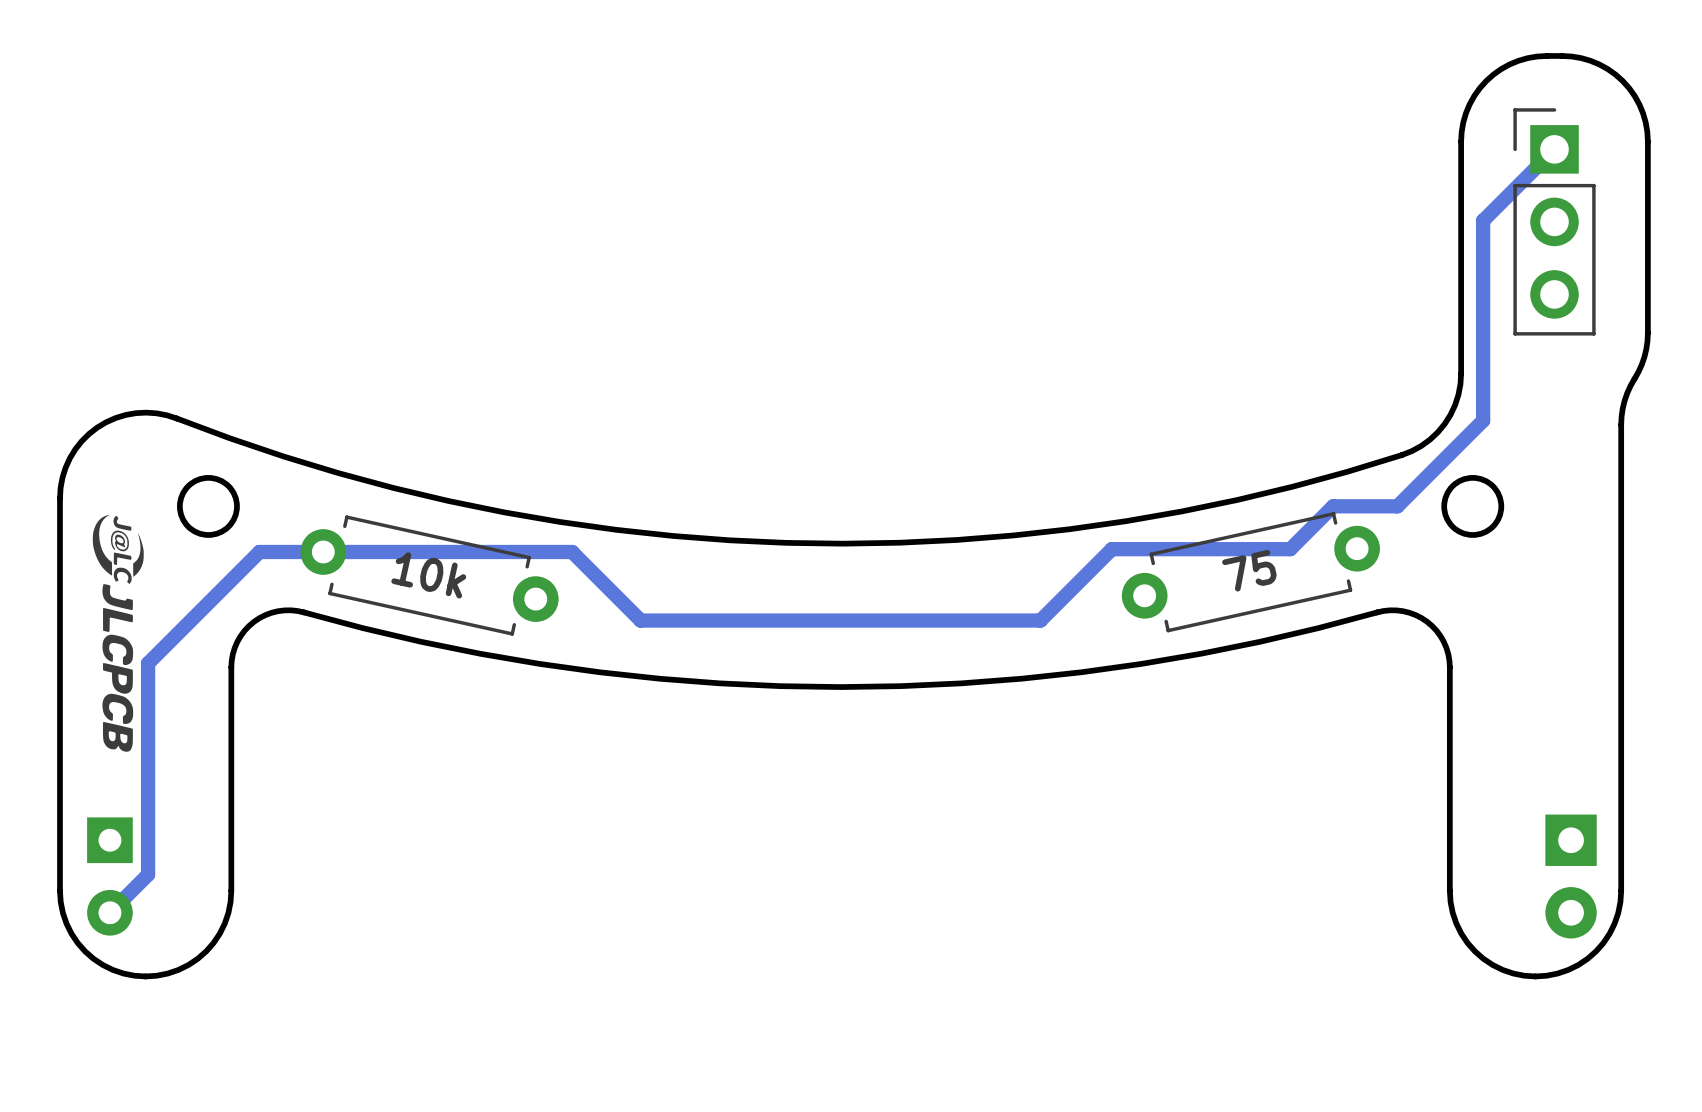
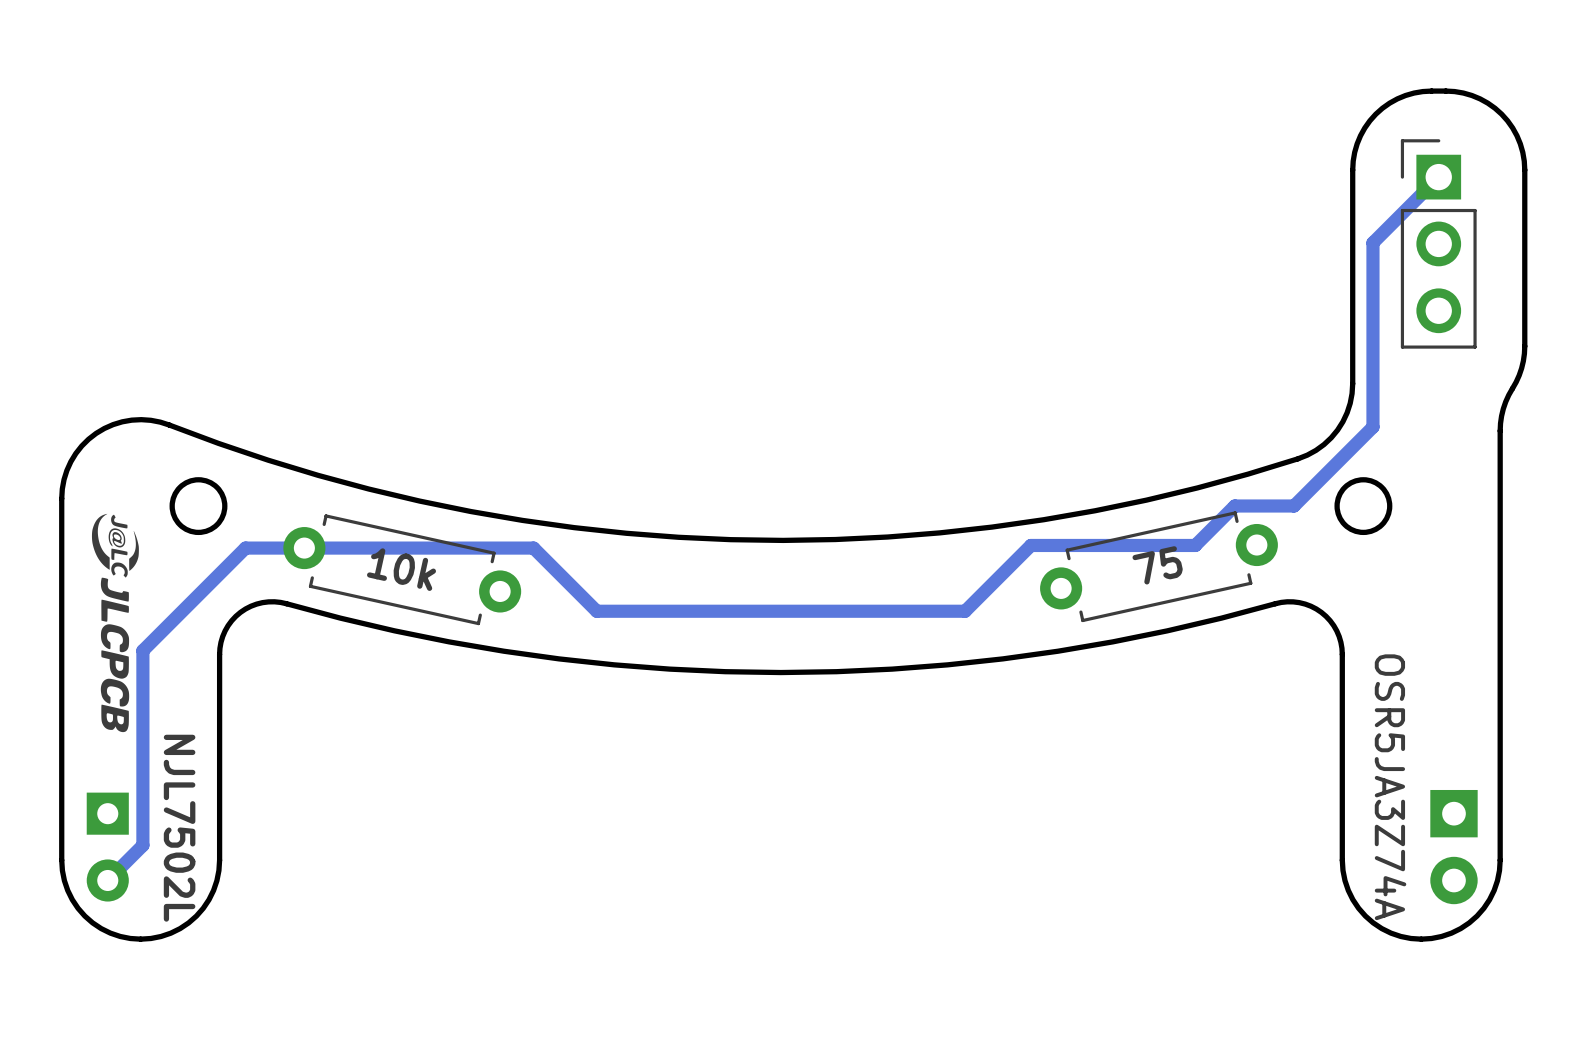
part value: none -> OSR5JA3Z74A (1390, 787)
part value: none -> NJL7502L (179, 828)

